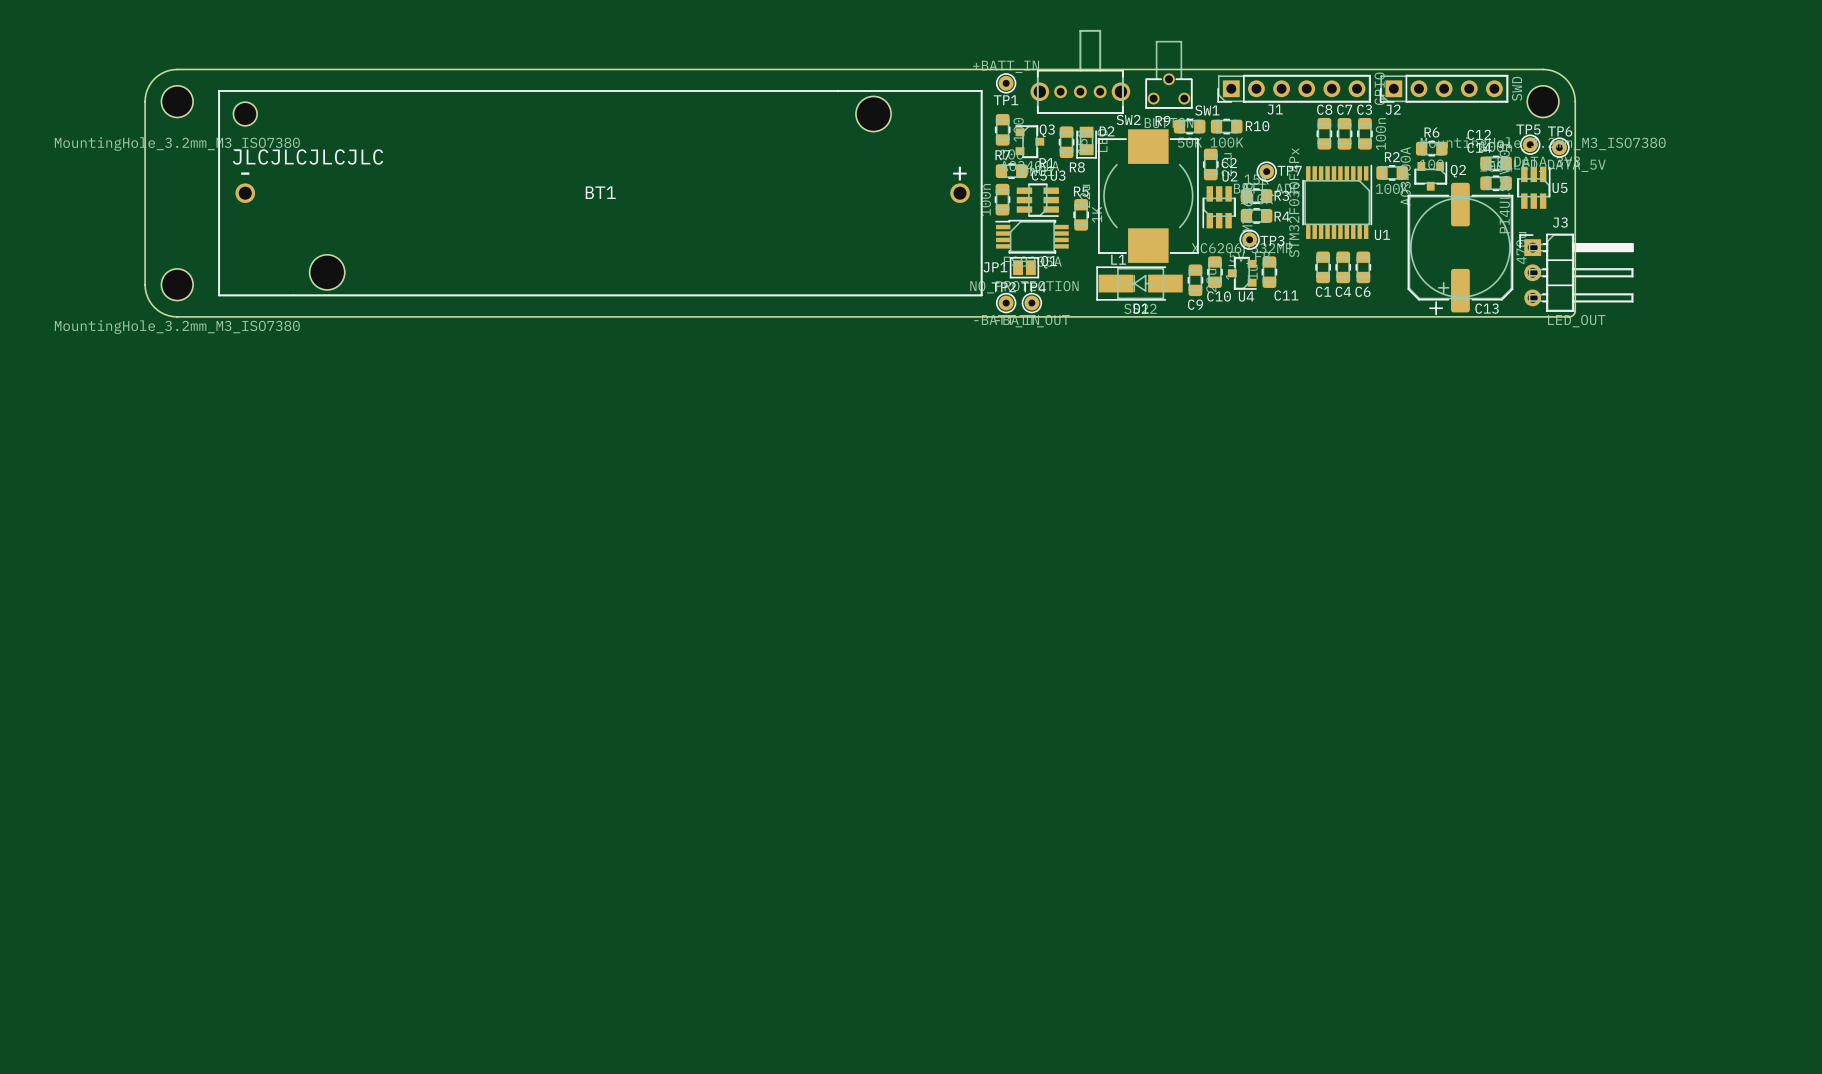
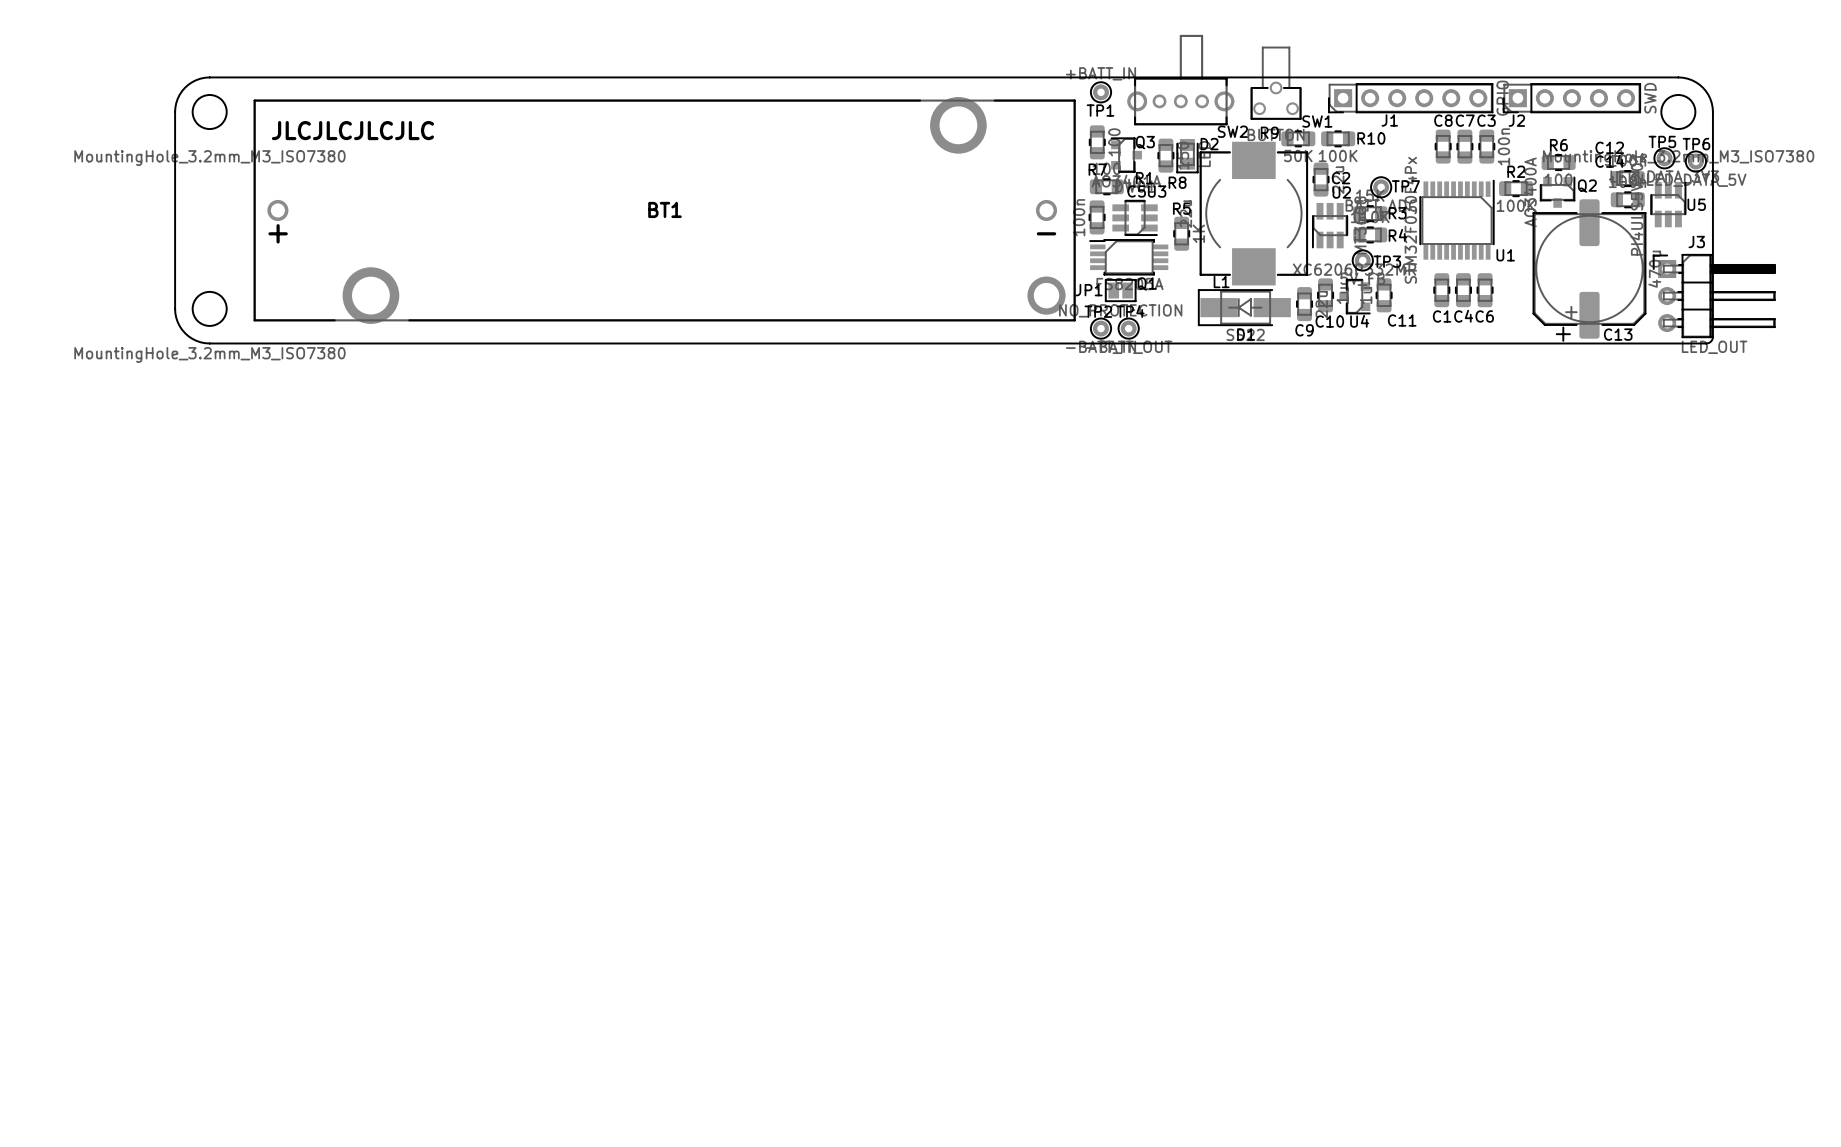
BT1 footprint: [218, 90, 983, 297] -> [253, 96, 1076, 324]
text position: JLCJLCJLCJLC (308, 157) -> JLCJLCJLCJLC (352, 130)

